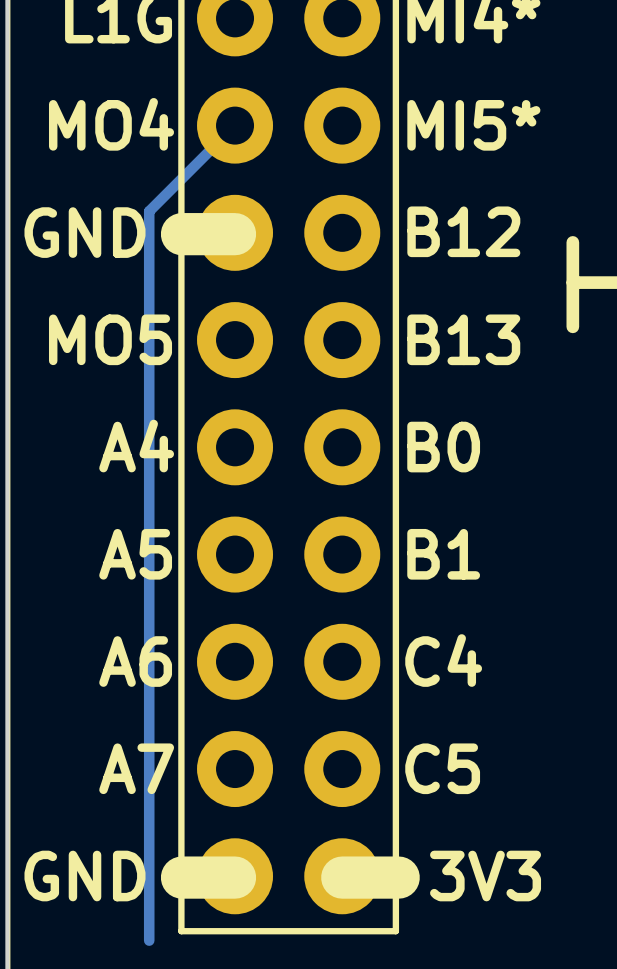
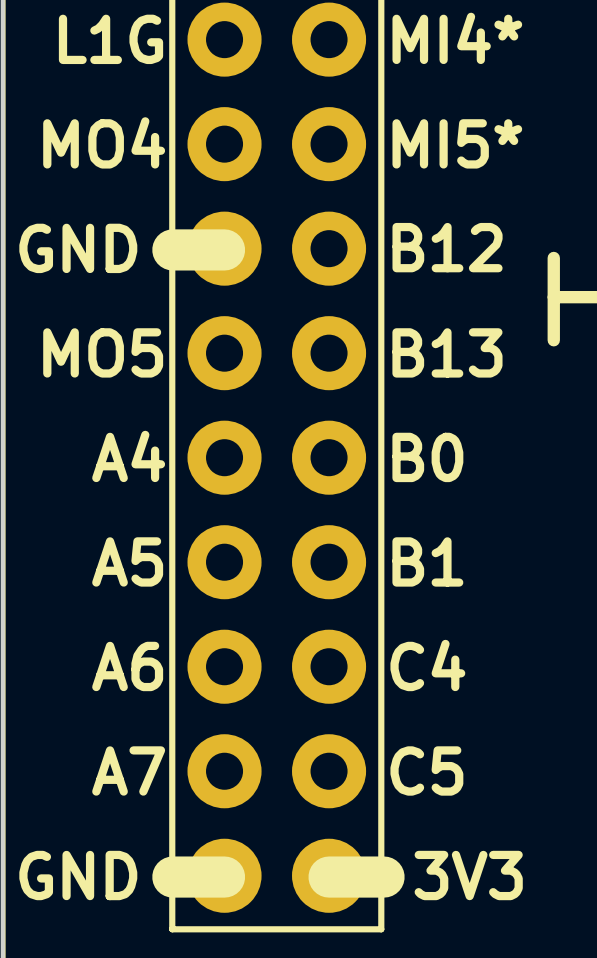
track: (235, 125) (149, 211) (149, 940) -> none

